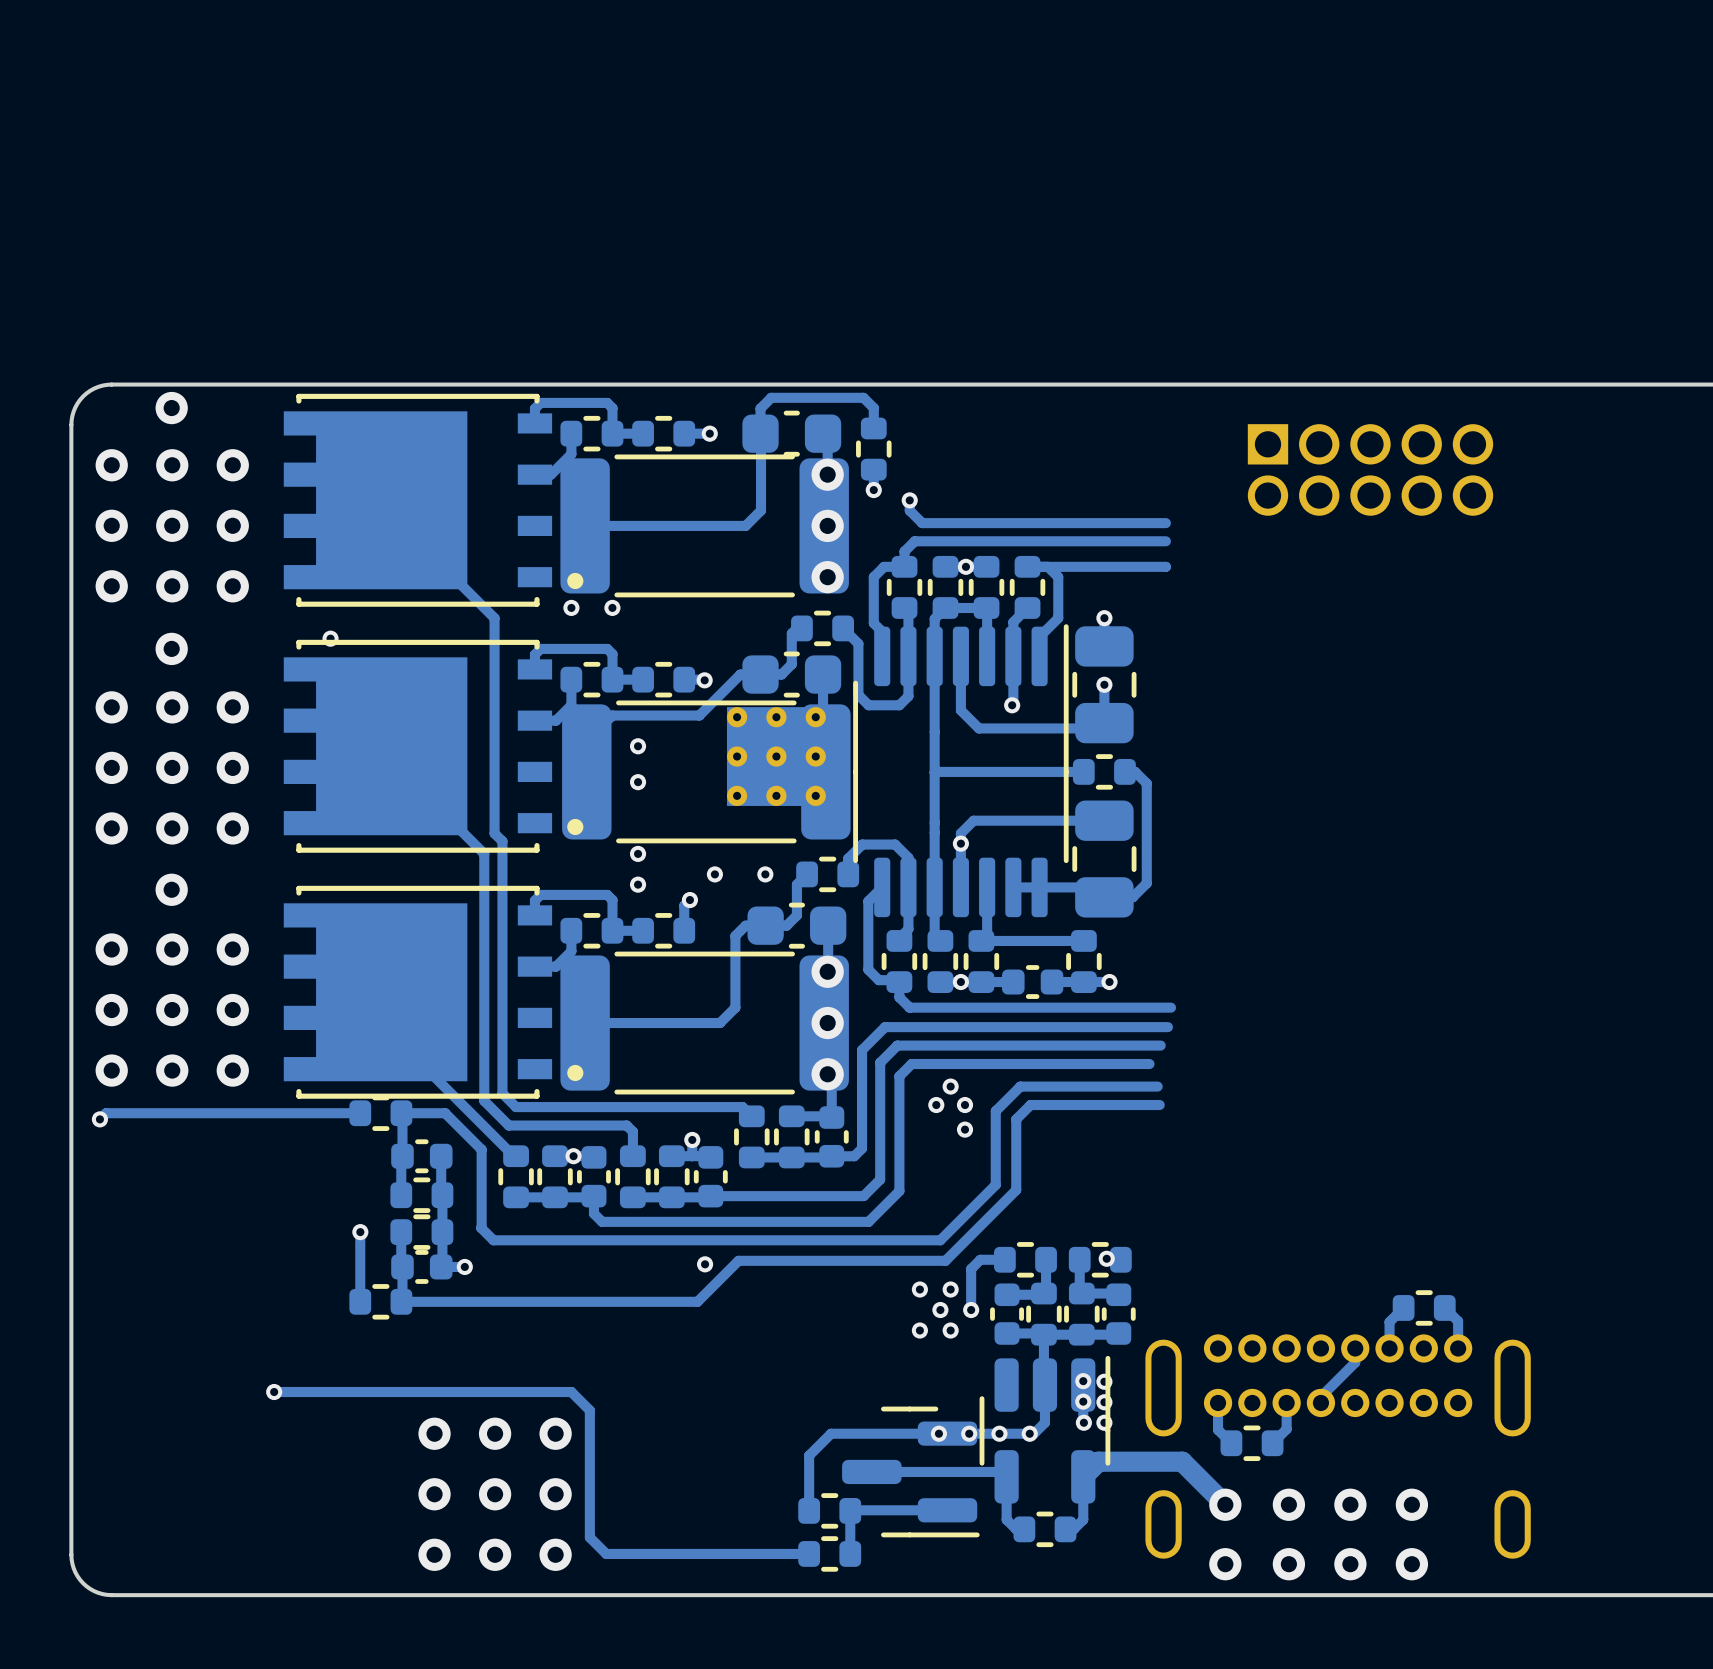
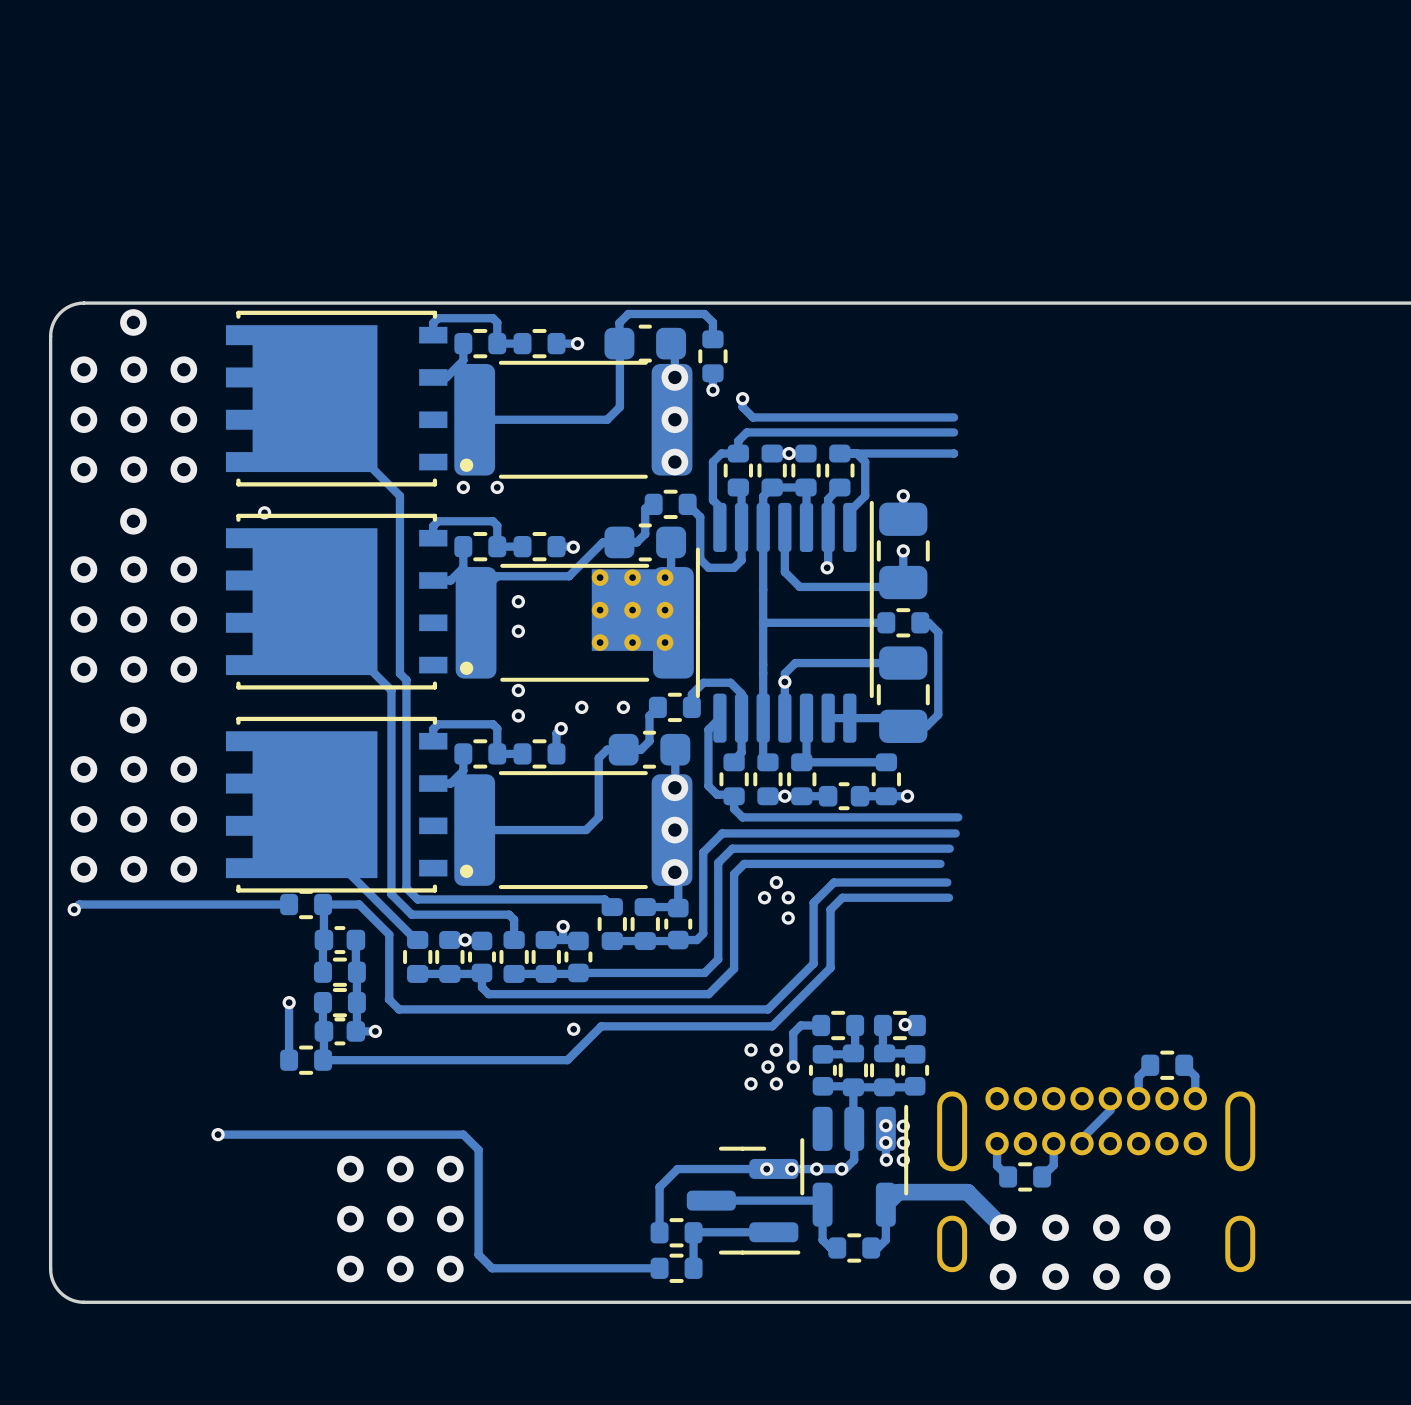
part: (1370, 469) -> none

